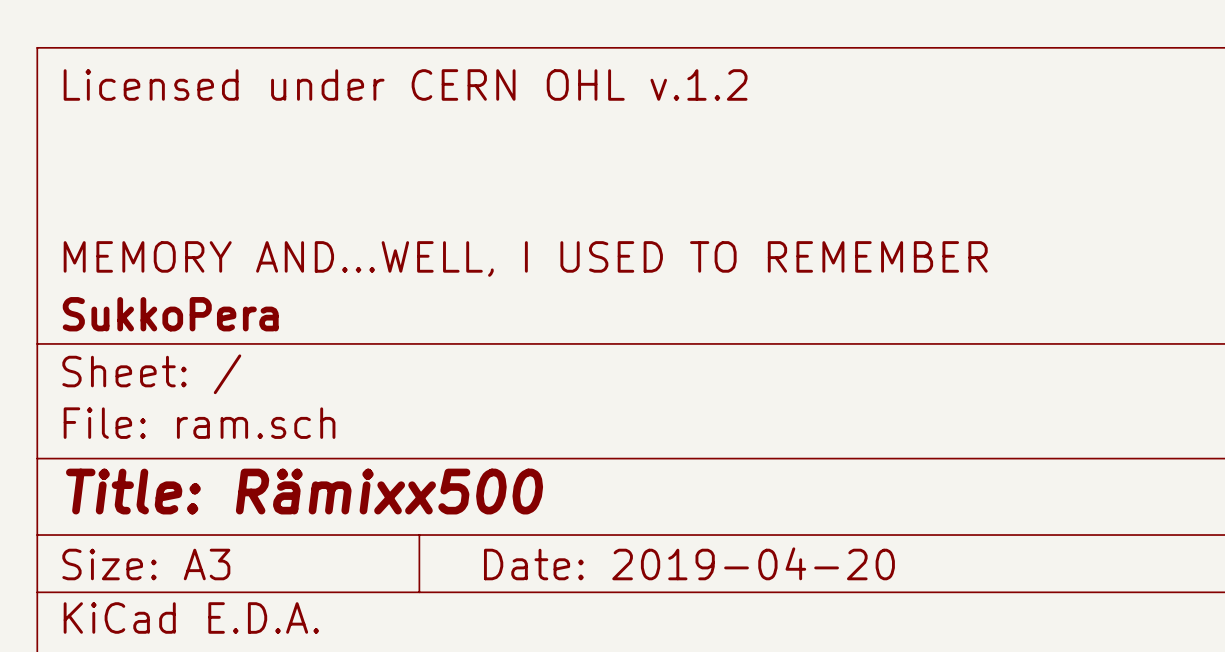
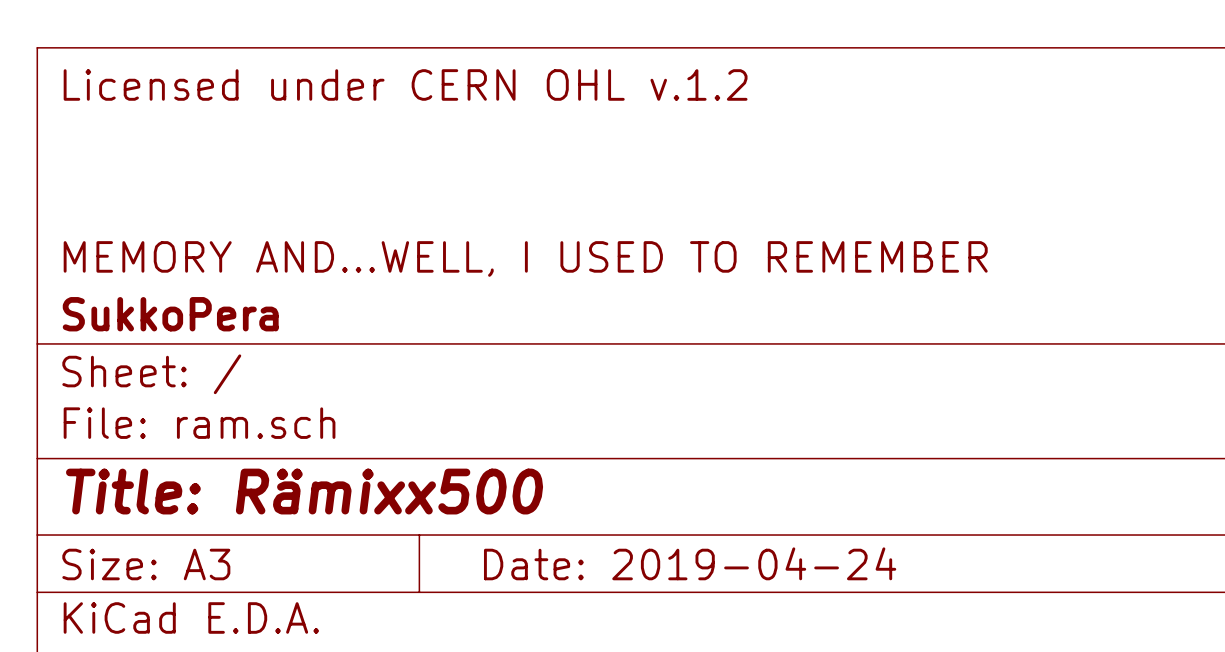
title block: Date: 2019-04-20 (689, 563) -> Date: 2019-04-24 (690, 563)

